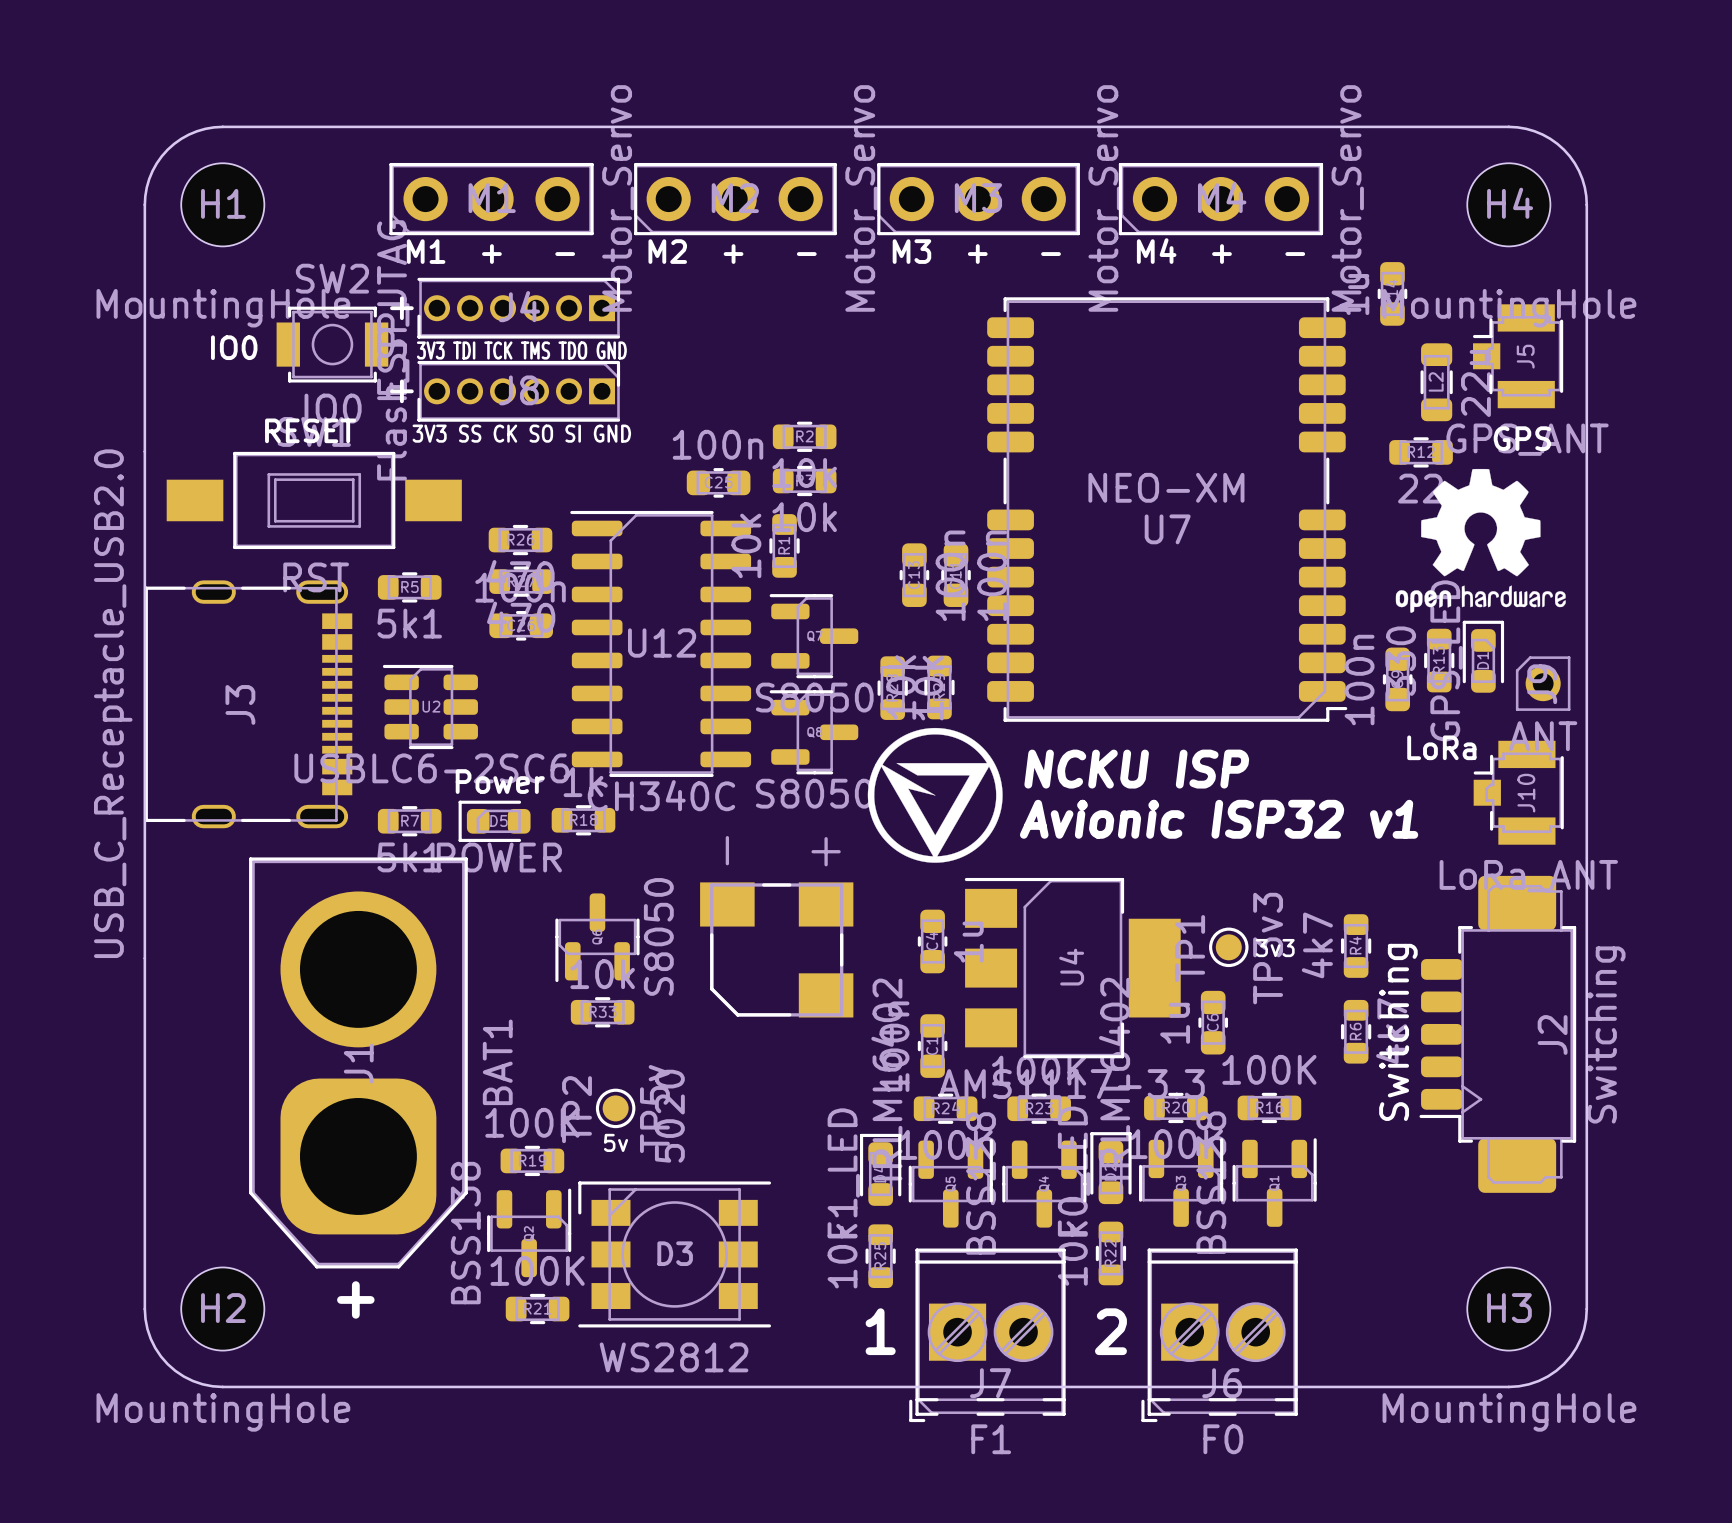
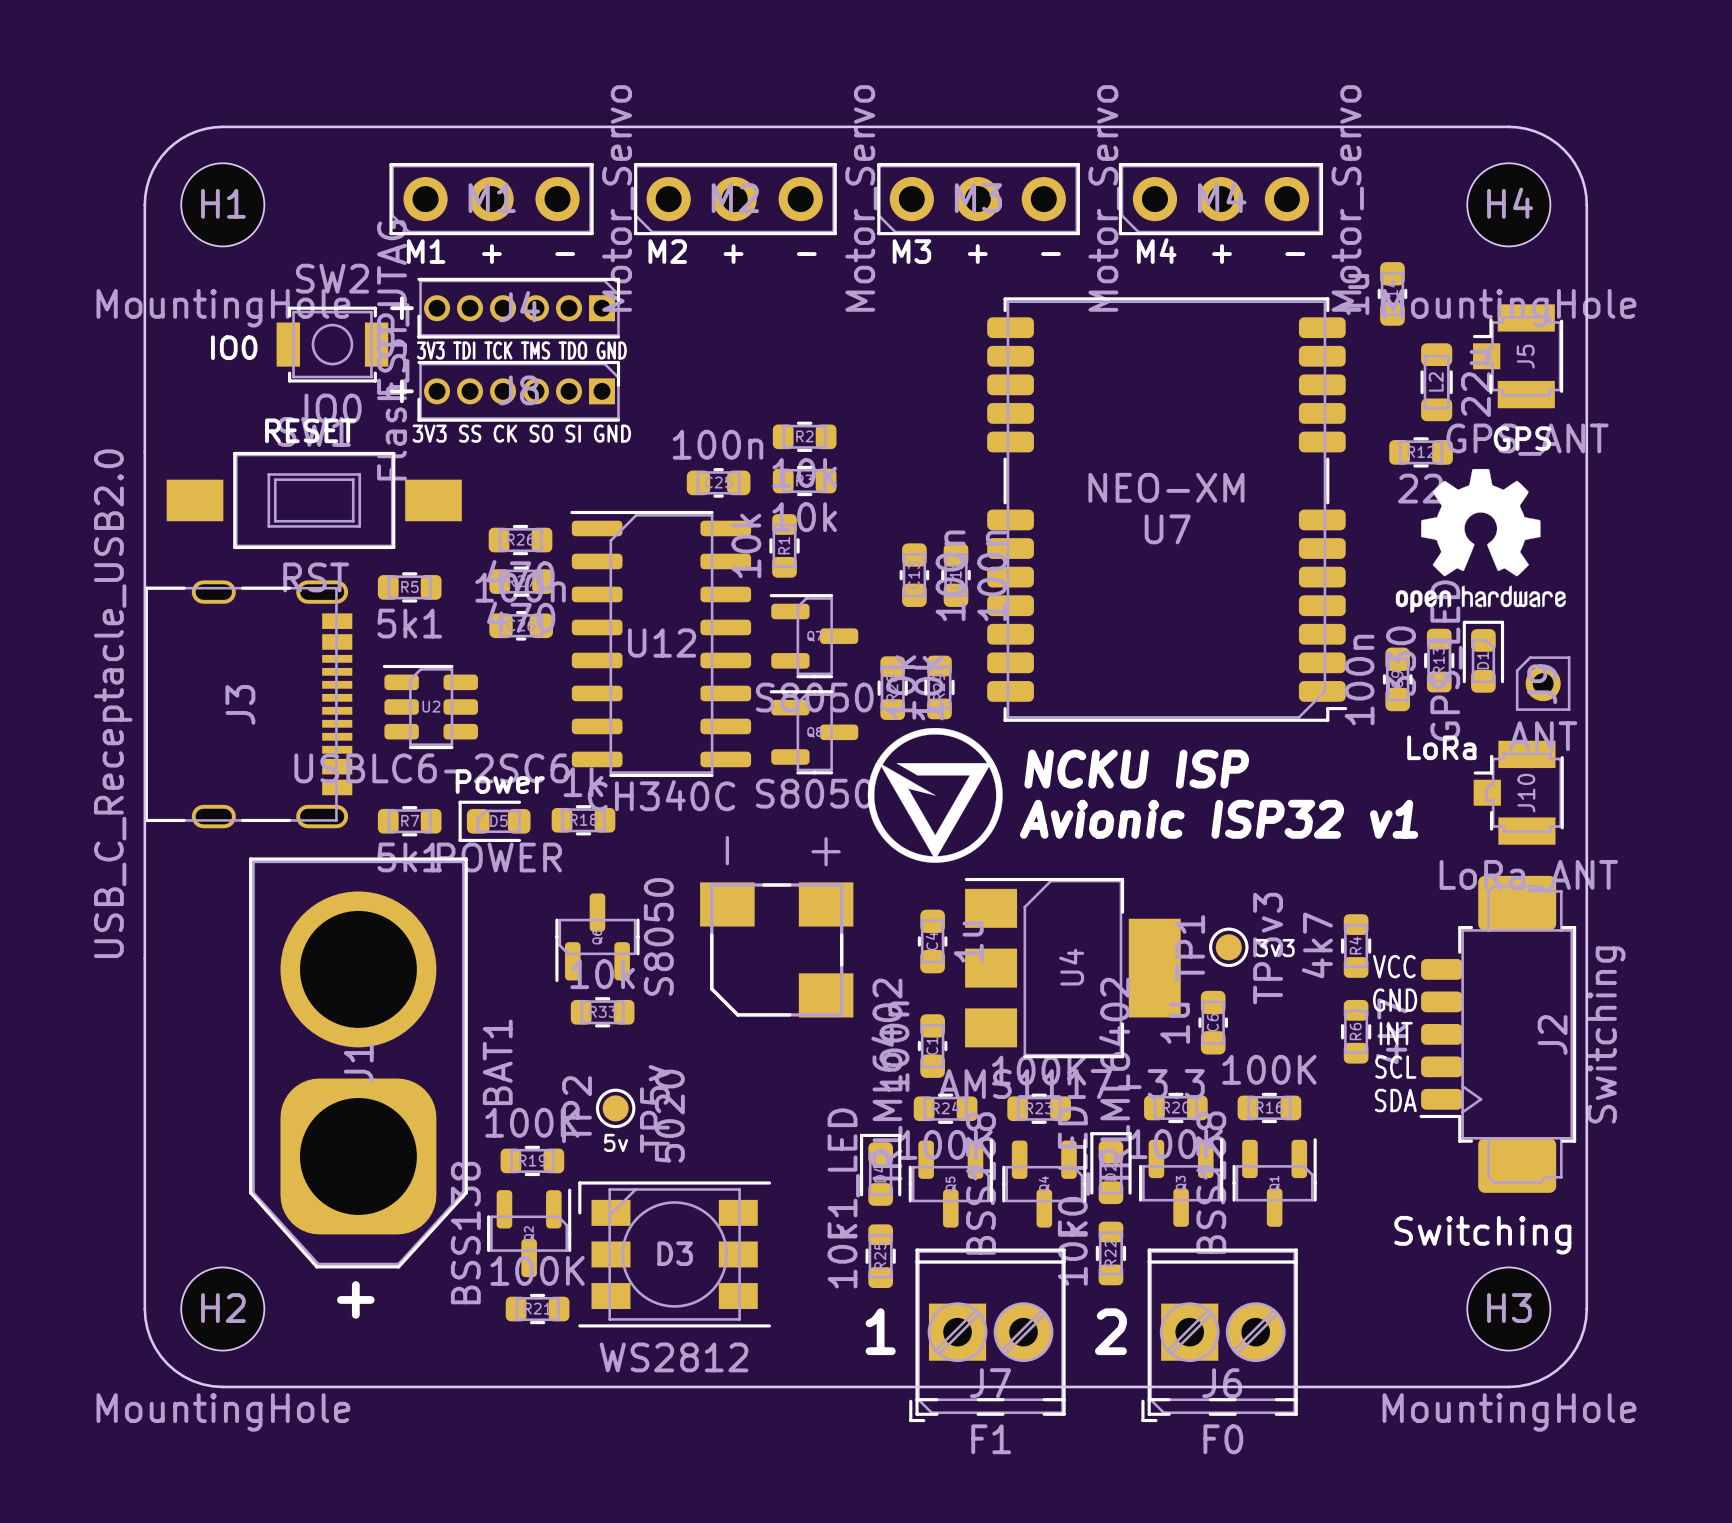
text: none -> VCC (1394, 966)
text: none -> GND (1395, 1000)
text rotation: 0° (1398, 1032) -> 90° clockwise (1482, 1235)
text: none -> INT (1396, 1033)
text: none -> SCL (1395, 1067)
text: none -> SDA (1395, 1100)

